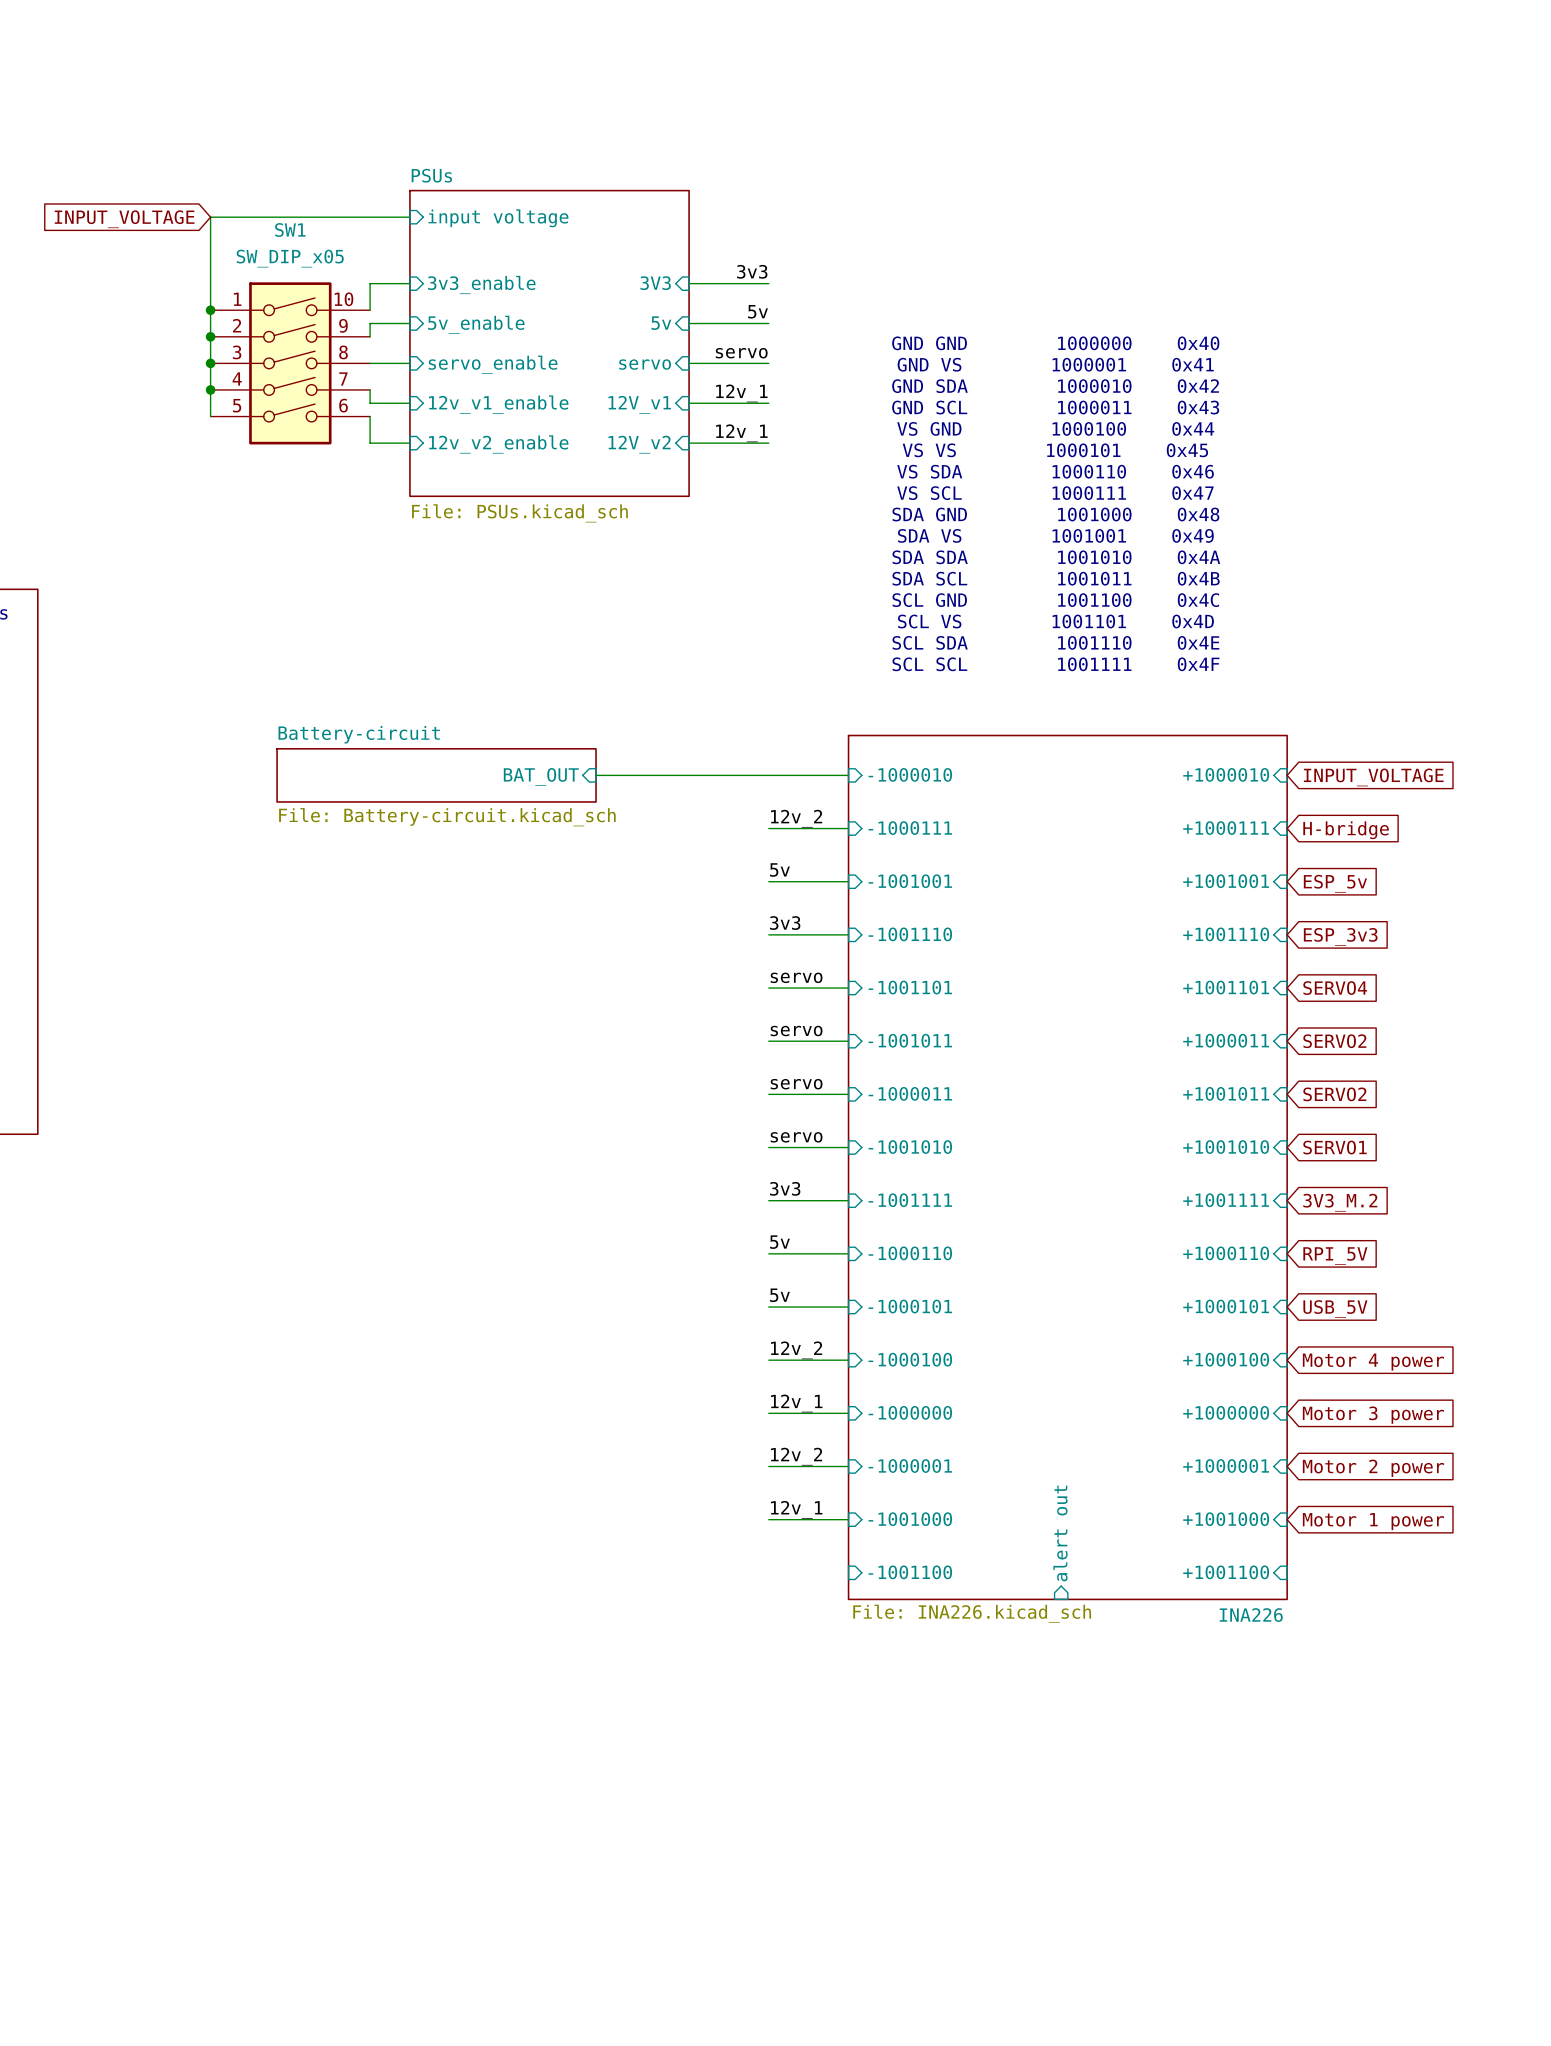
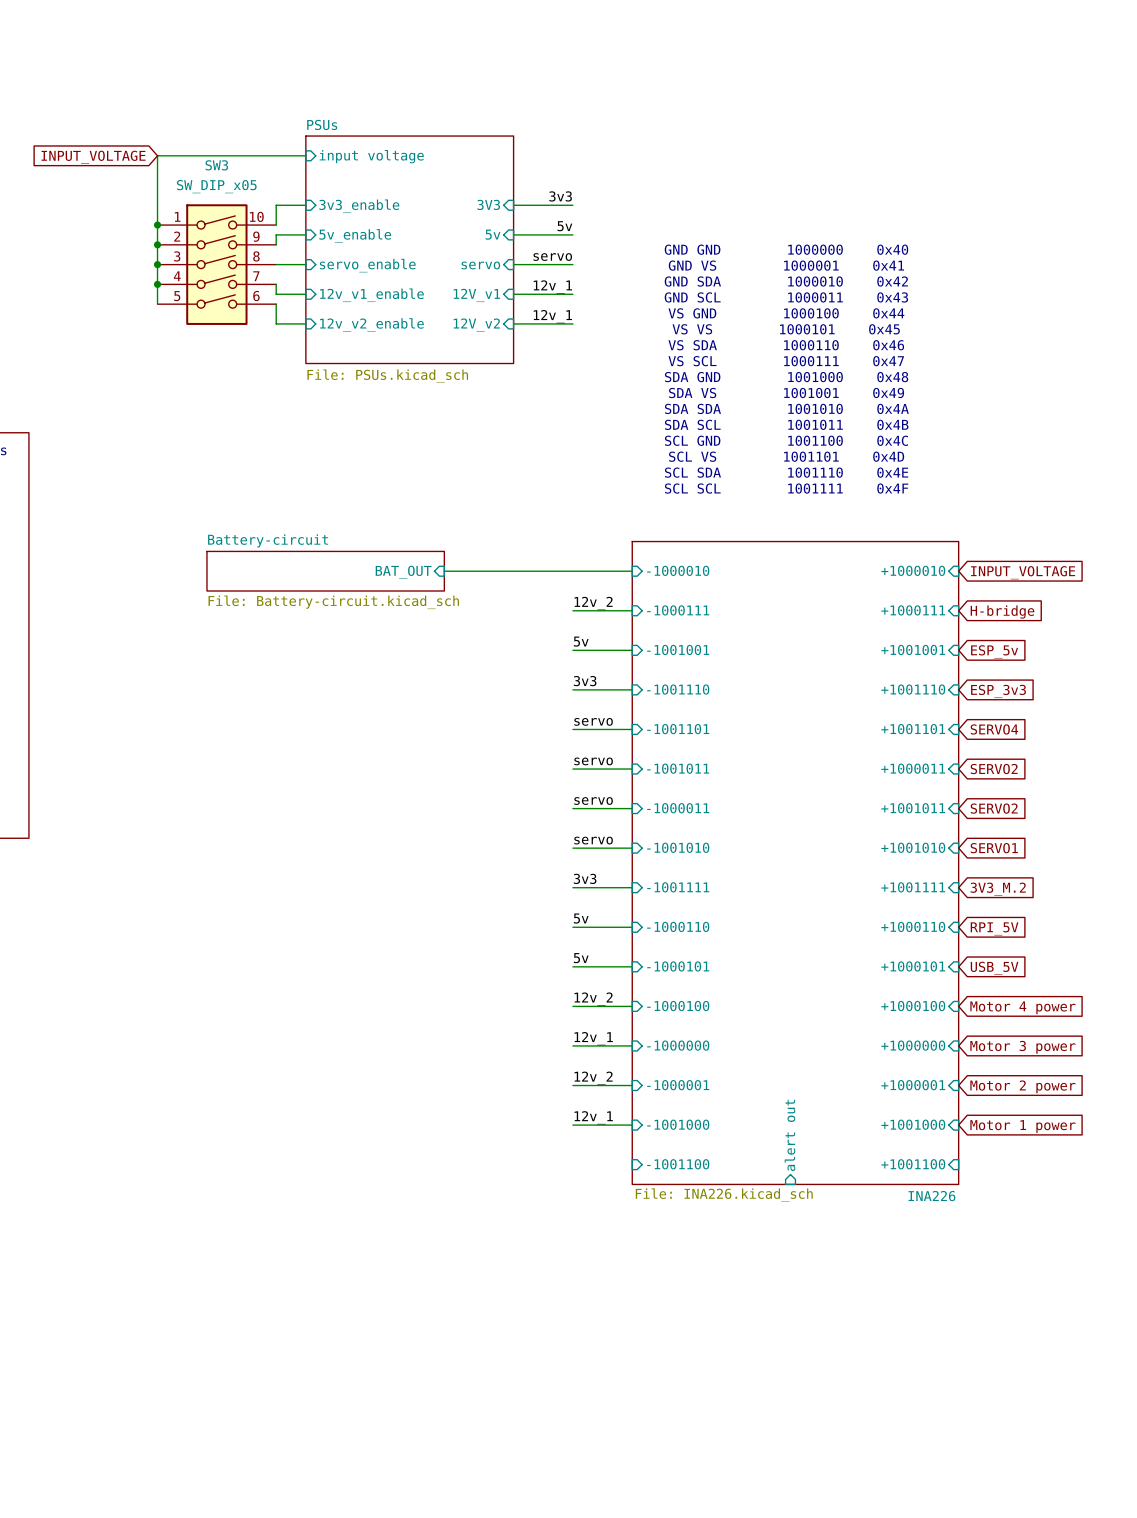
SW1 name: SW1 (290, 229) -> SW3 (216, 165)

